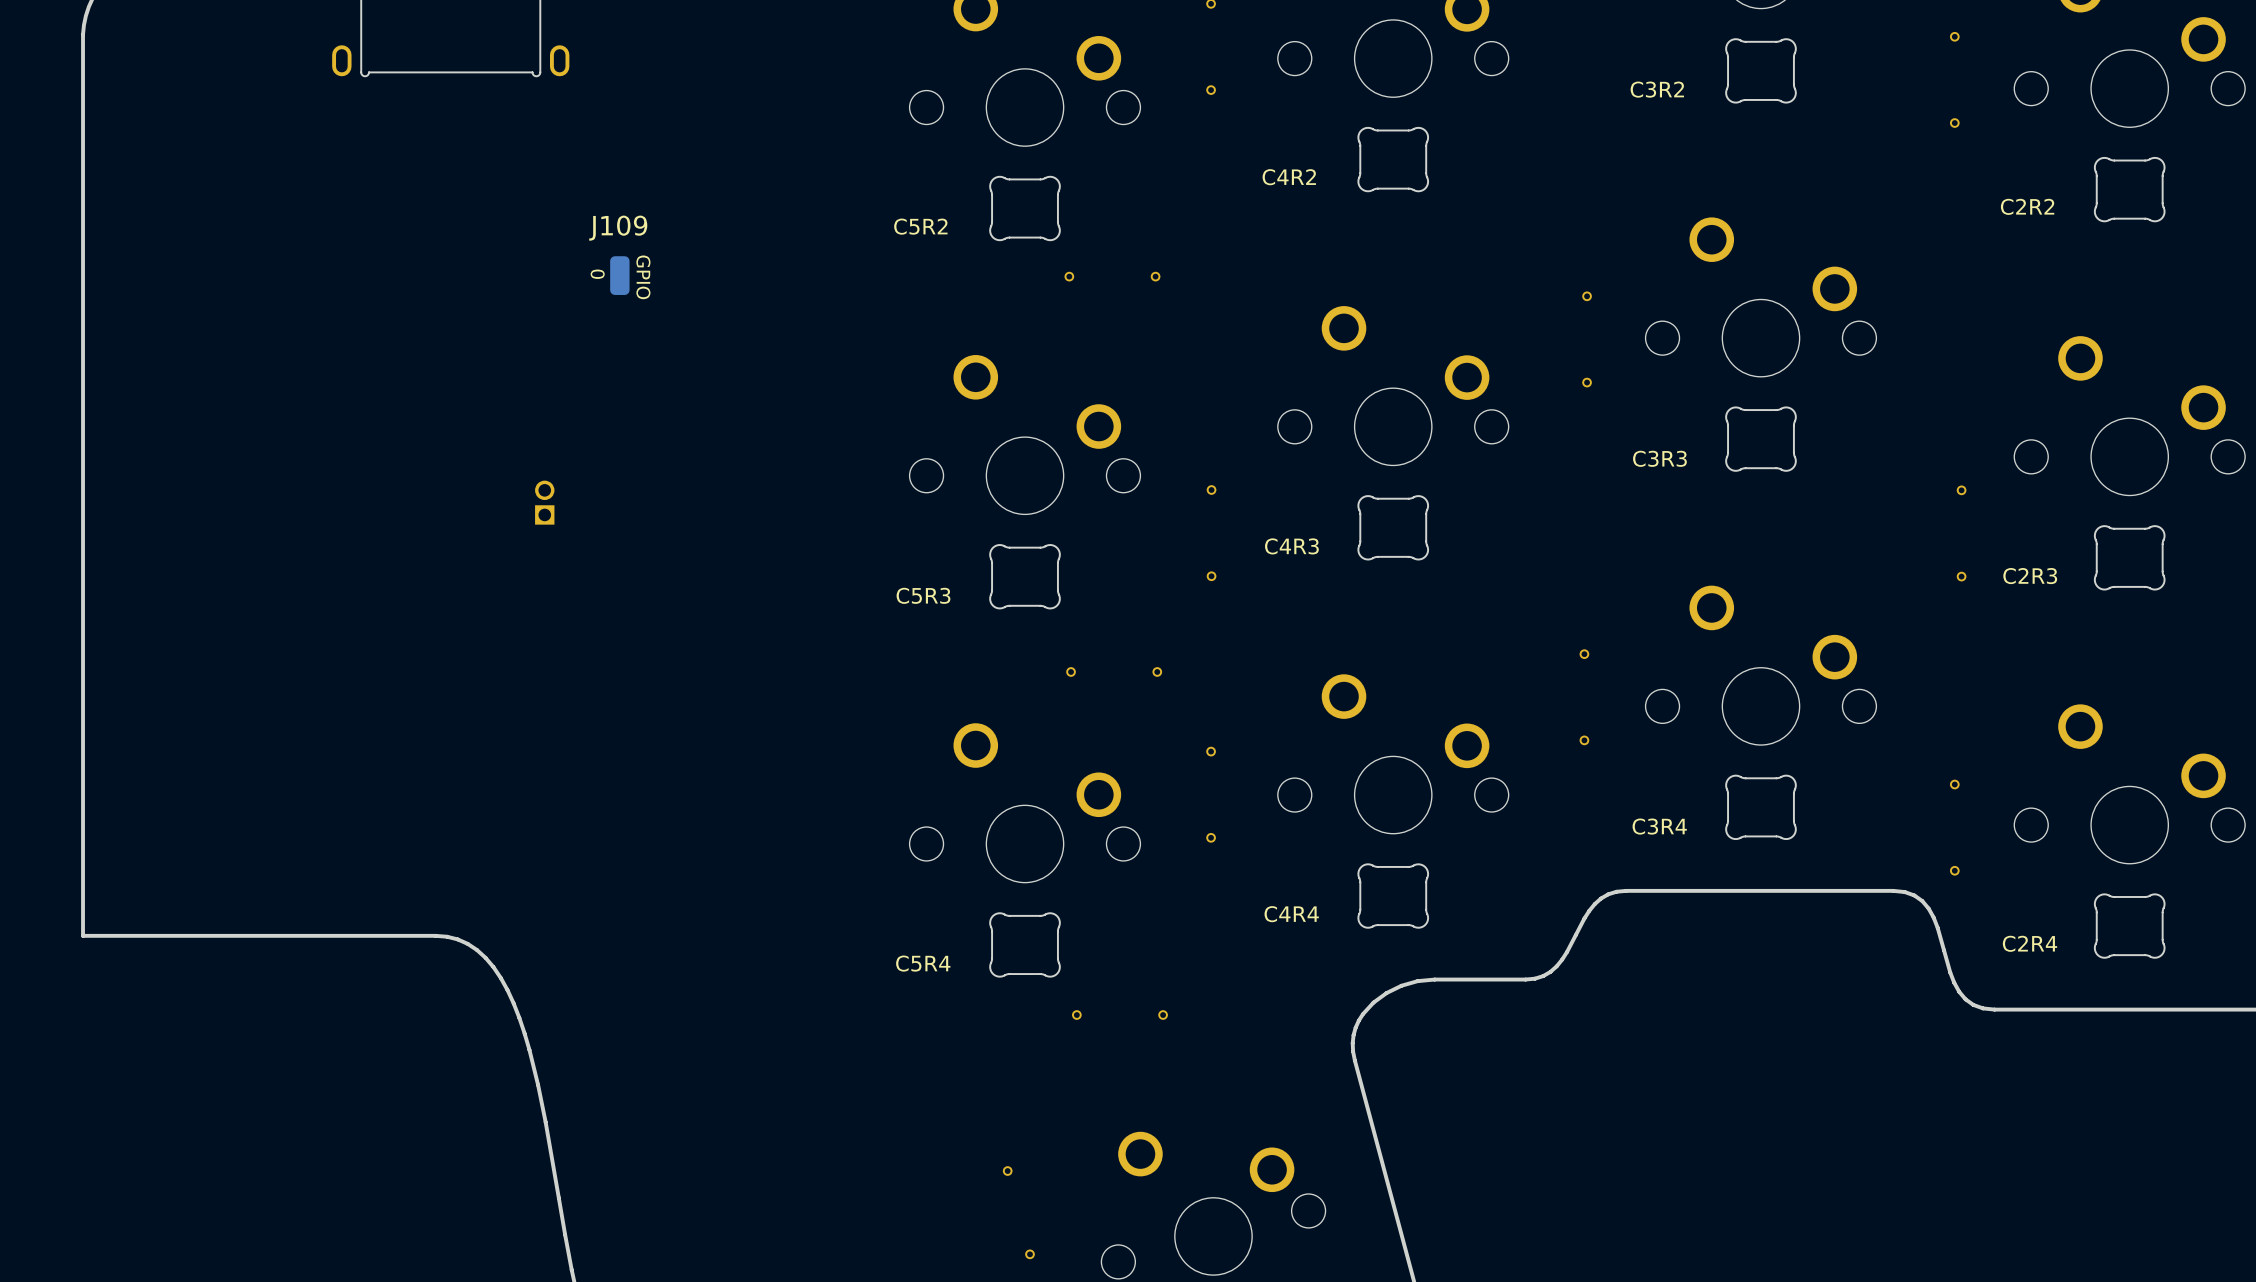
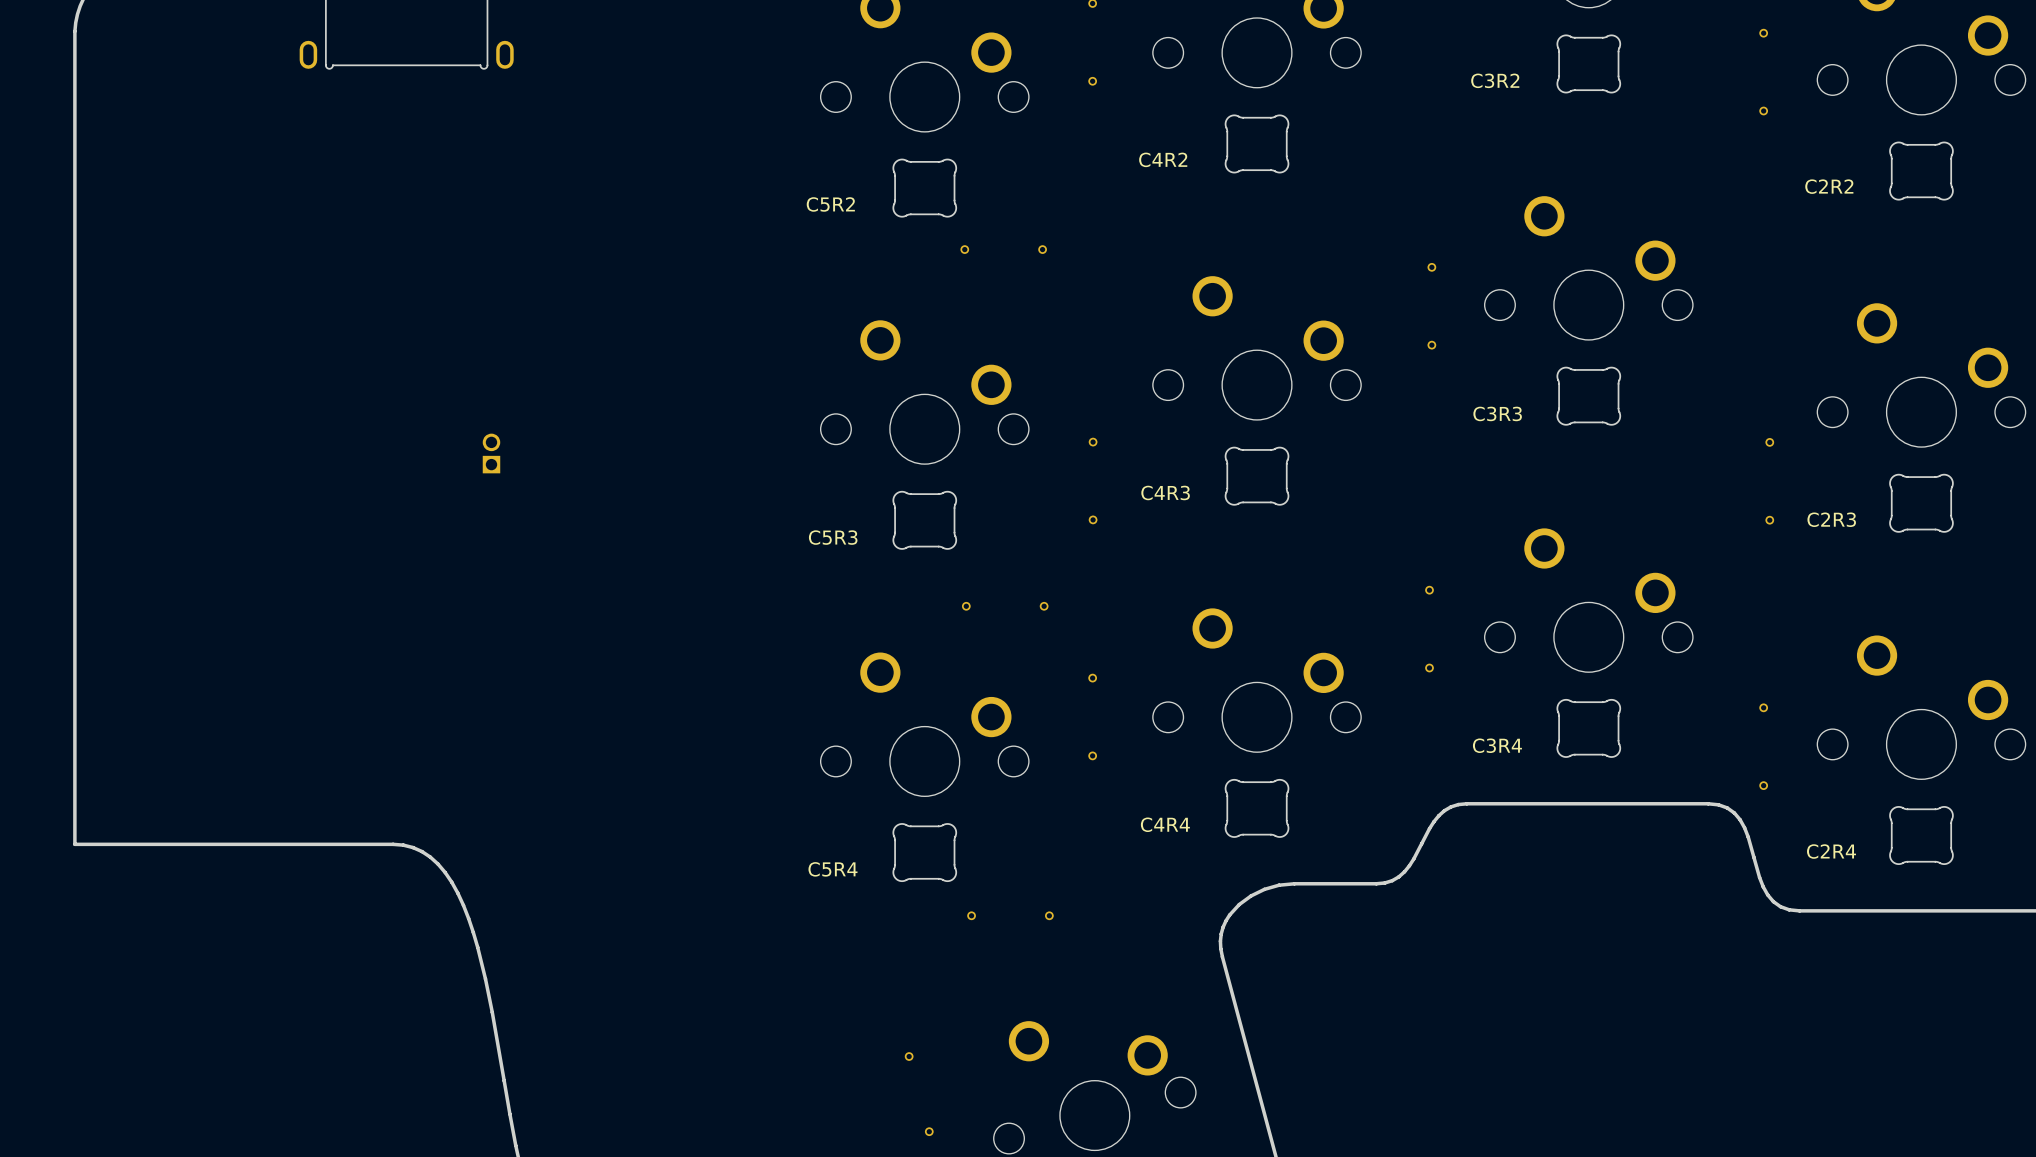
text: 0 (597, 274) -> none
J109: (619, 275) -> none
text: GPIO (643, 277) -> none

